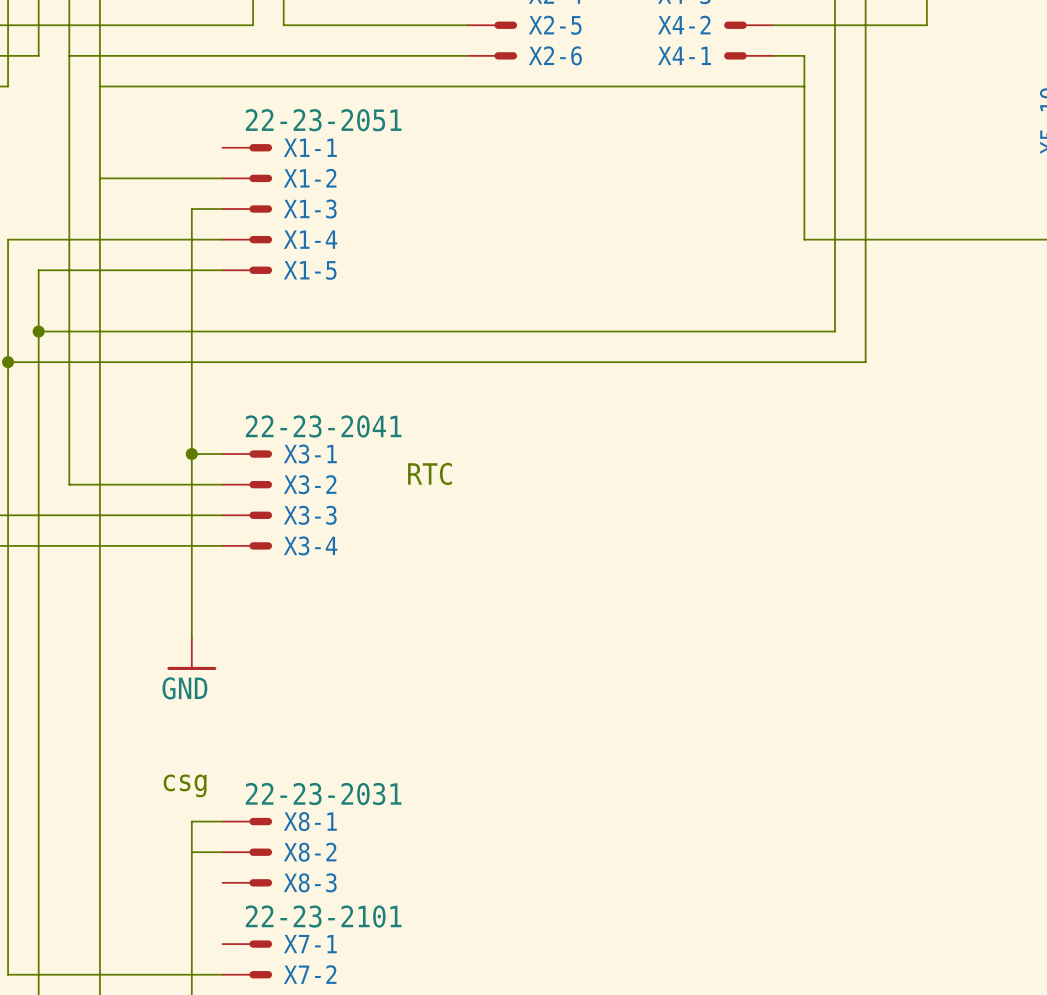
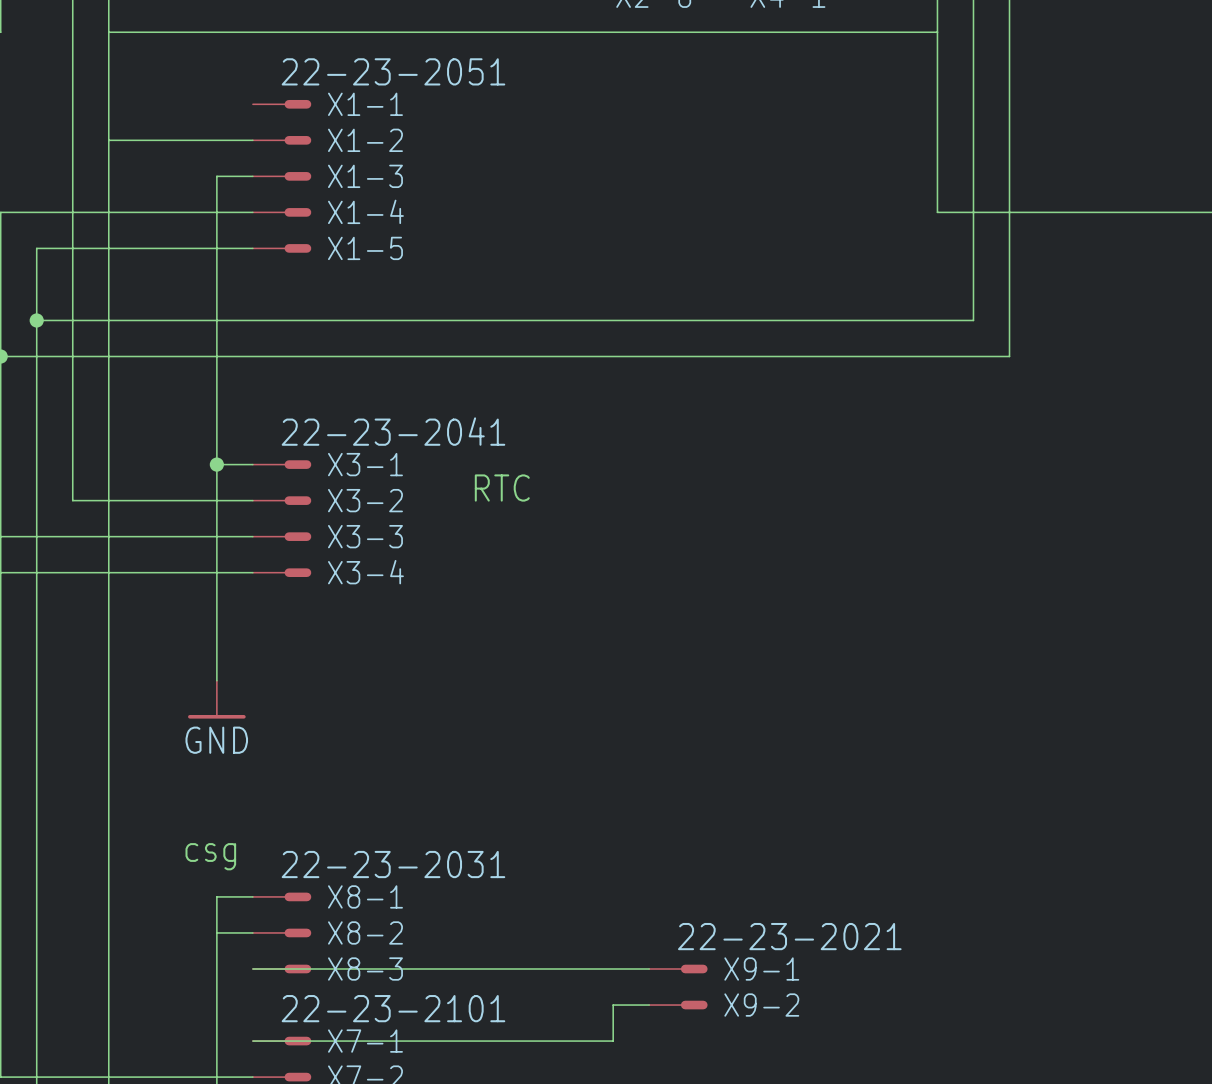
wire: none -> (252, 969) (649, 969)
X9-1: none -> 22-23-2021 (678, 969)
wire: none -> (649, 1005) (613, 1005) (613, 1041) (252, 1041)
X9-2: none -> (678, 1005)

